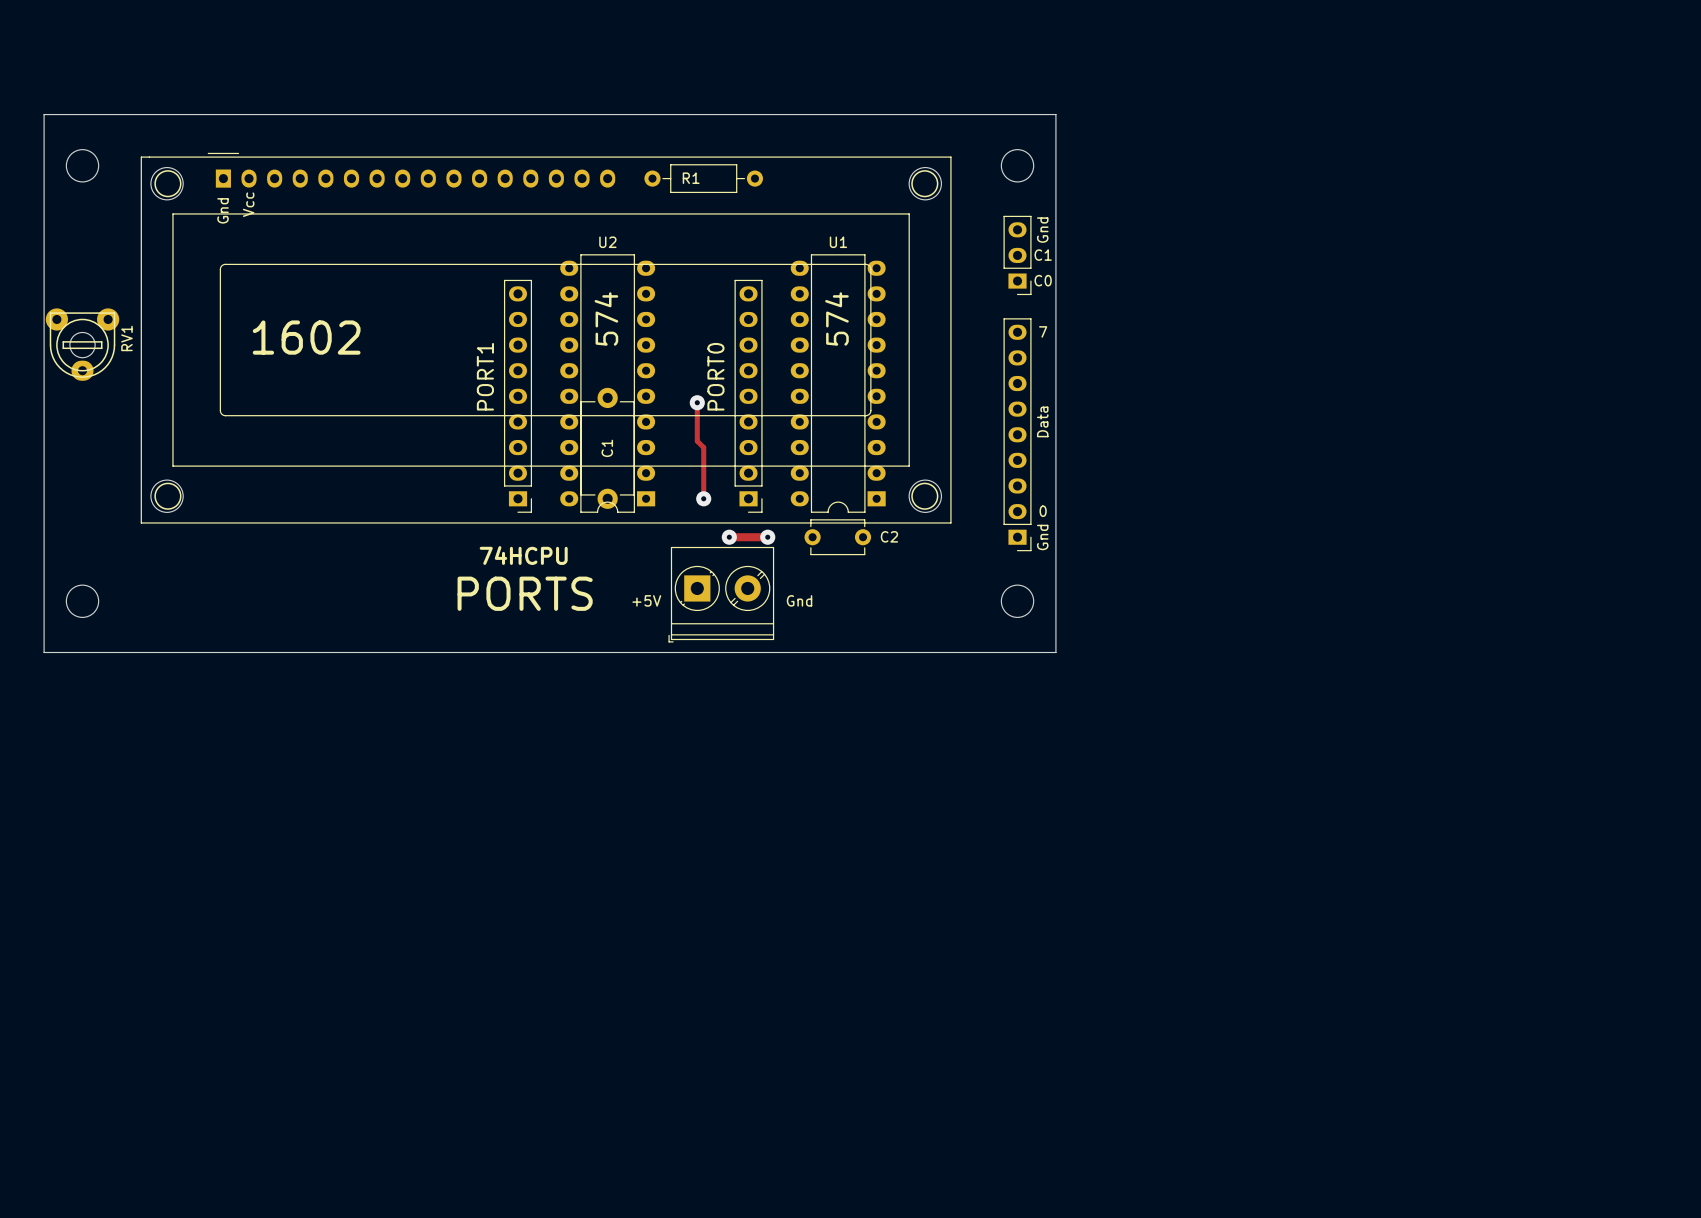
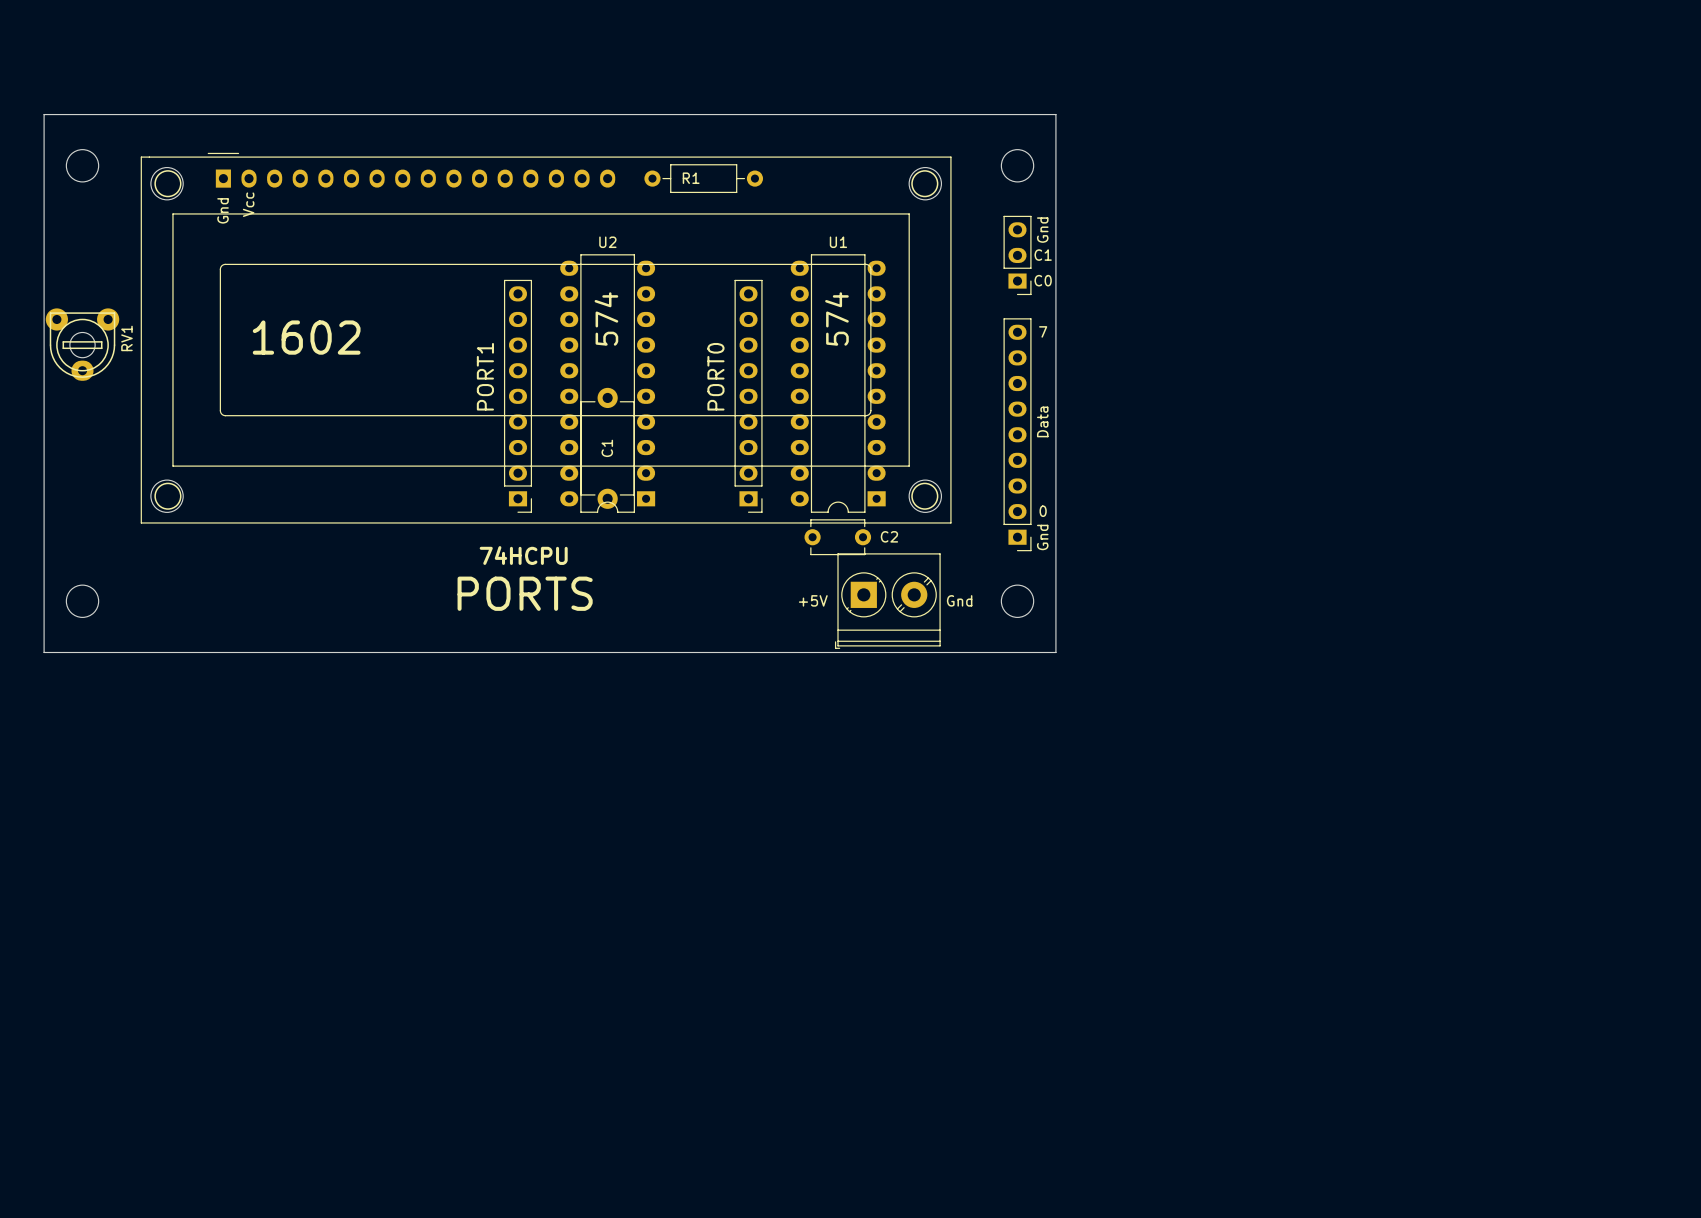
track: (697, 402) (697, 441) (703, 447) (703, 498) -> none
via: (697, 402) -> none
via: (703, 498) -> none
track: (729, 537) (767, 537) -> none
via: (729, 537) -> none
via: (767, 537) -> none
part position: (721, 594) -> (887, 601)
text position: +5V (646, 600) -> +5V (813, 600)
text position: Gnd (799, 600) -> Gnd (959, 600)

